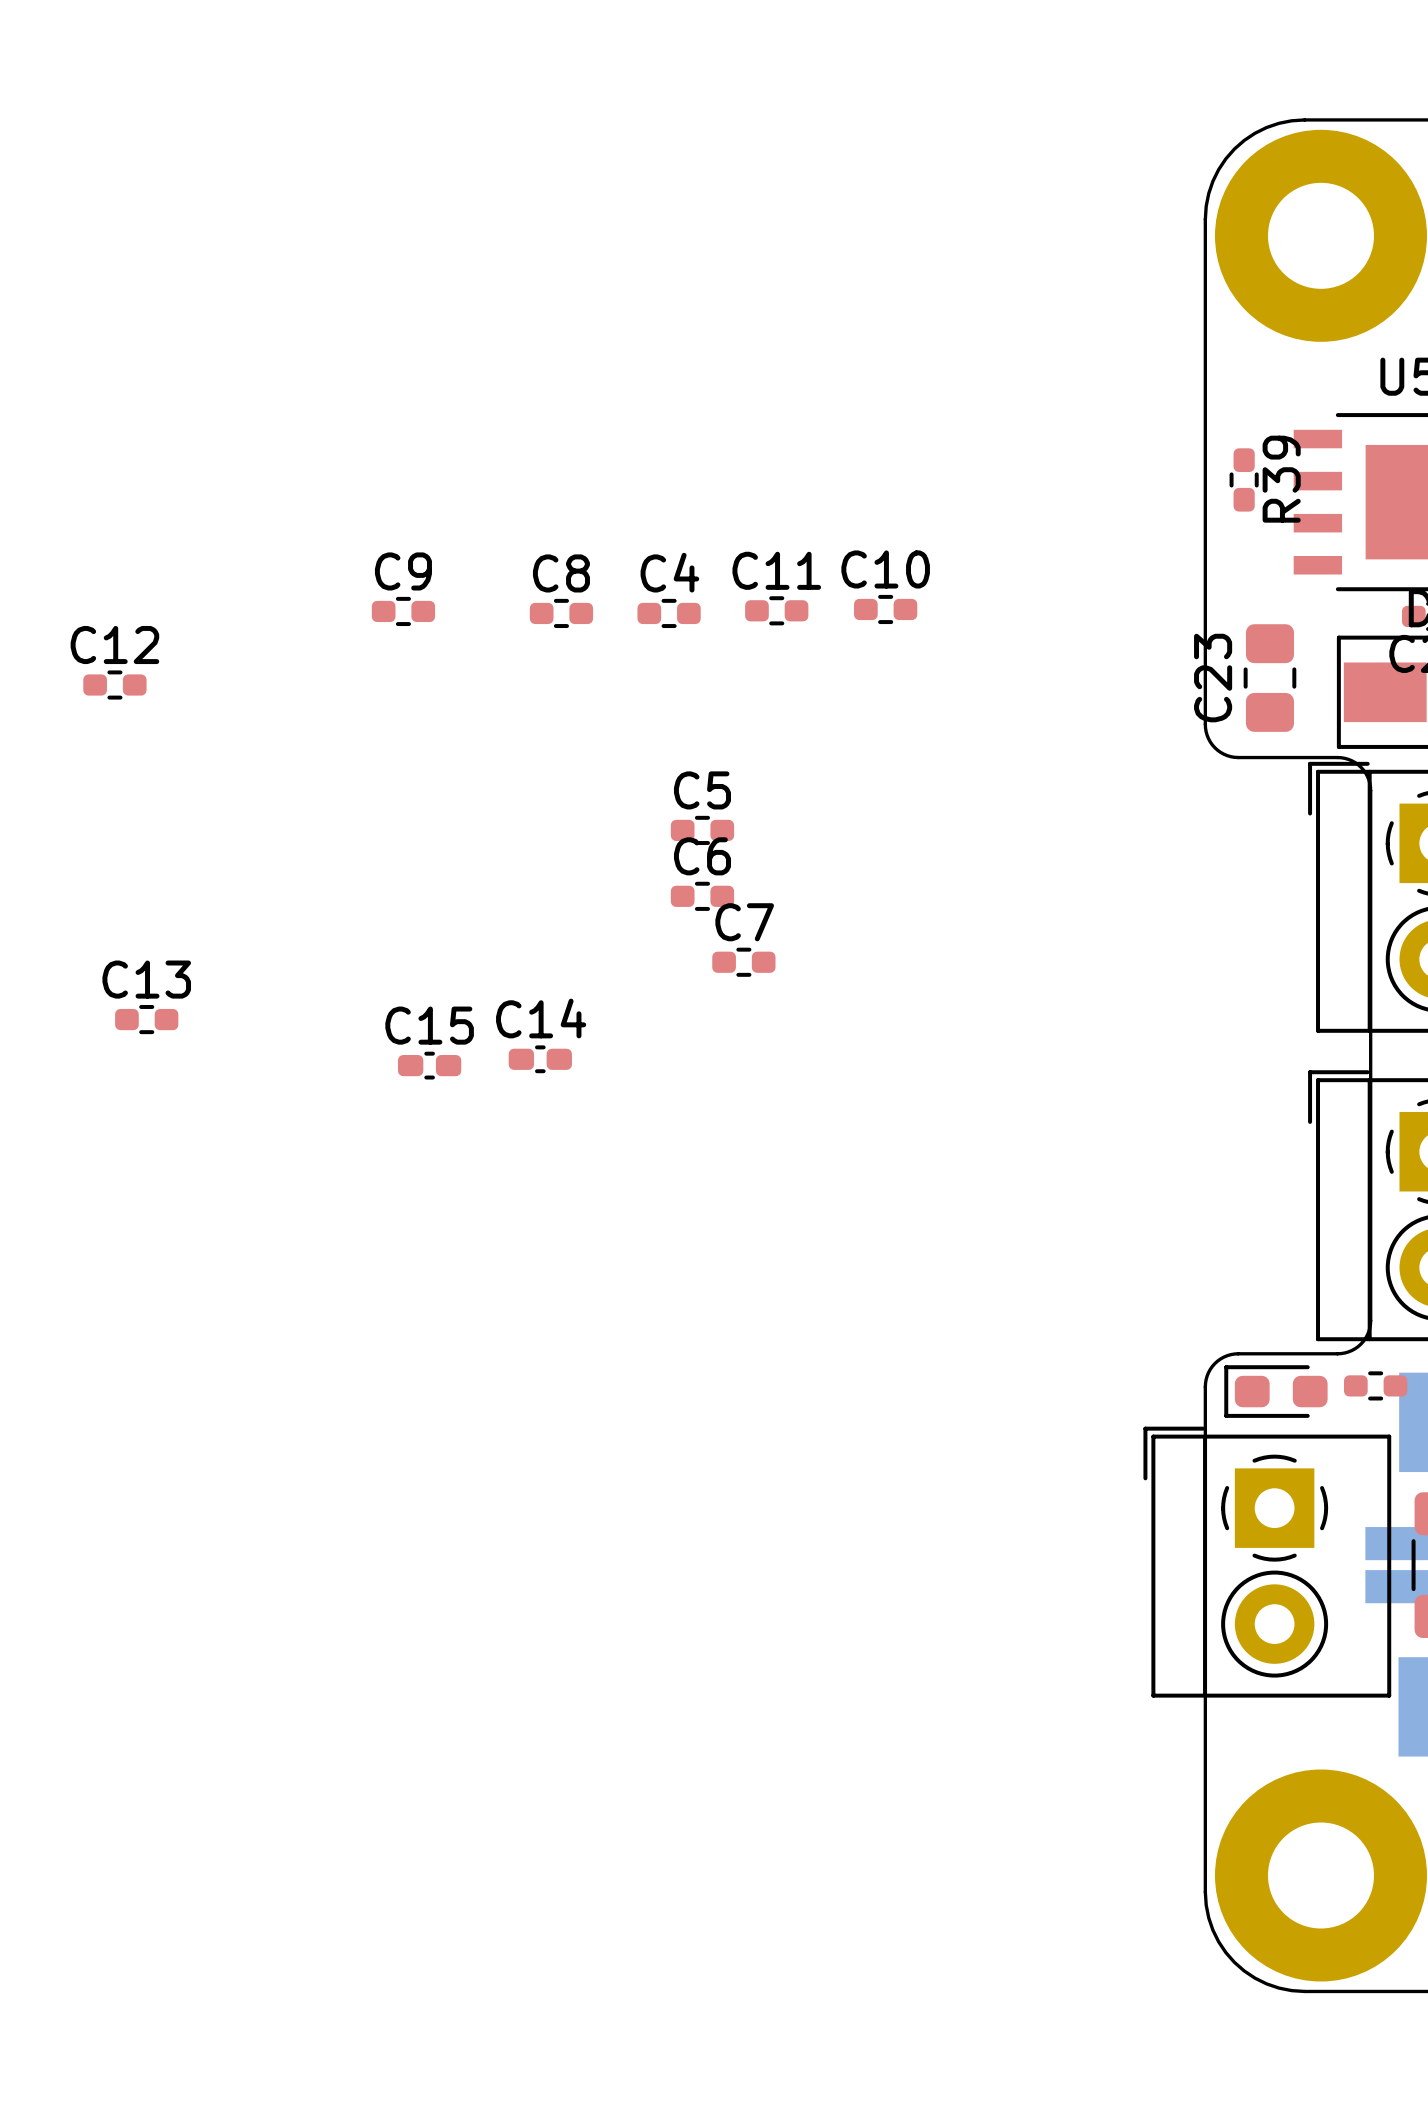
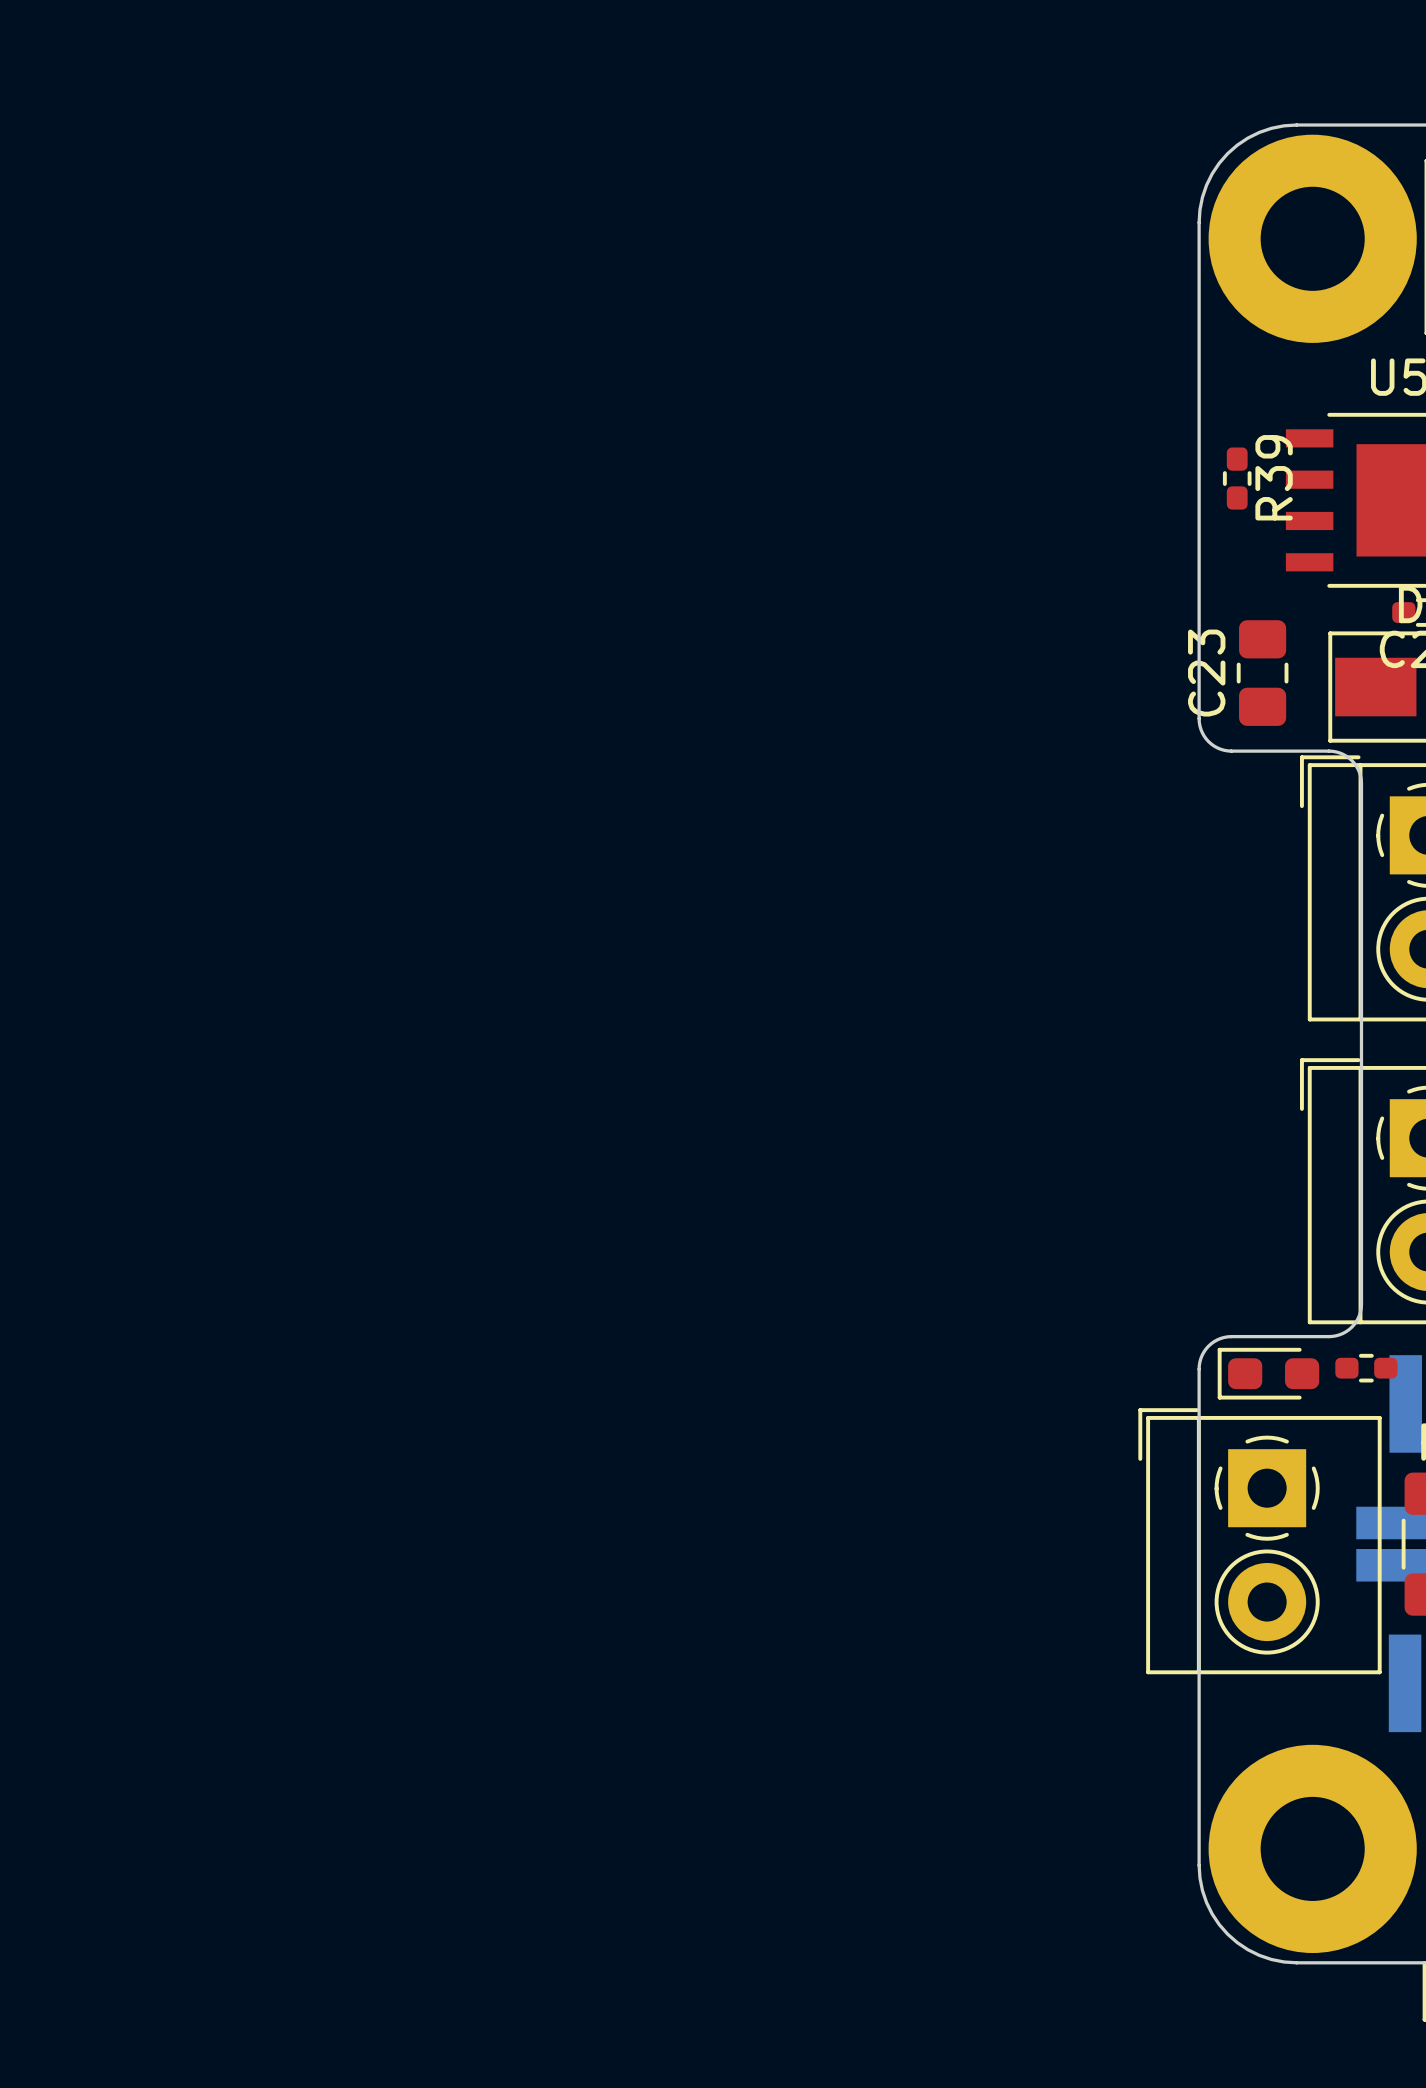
C10: (885, 609) -> none
C11: (776, 610) -> none
C9: (403, 611) -> none
C8: (561, 613) -> none
C4: (669, 613) -> none
C12: (114, 685) -> none
C5: (702, 830) -> none
C6: (702, 896) -> none
C7: (743, 962) -> none
C13: (146, 1019) -> none
C14: (540, 1059) -> none
C15: (429, 1065) -> none

